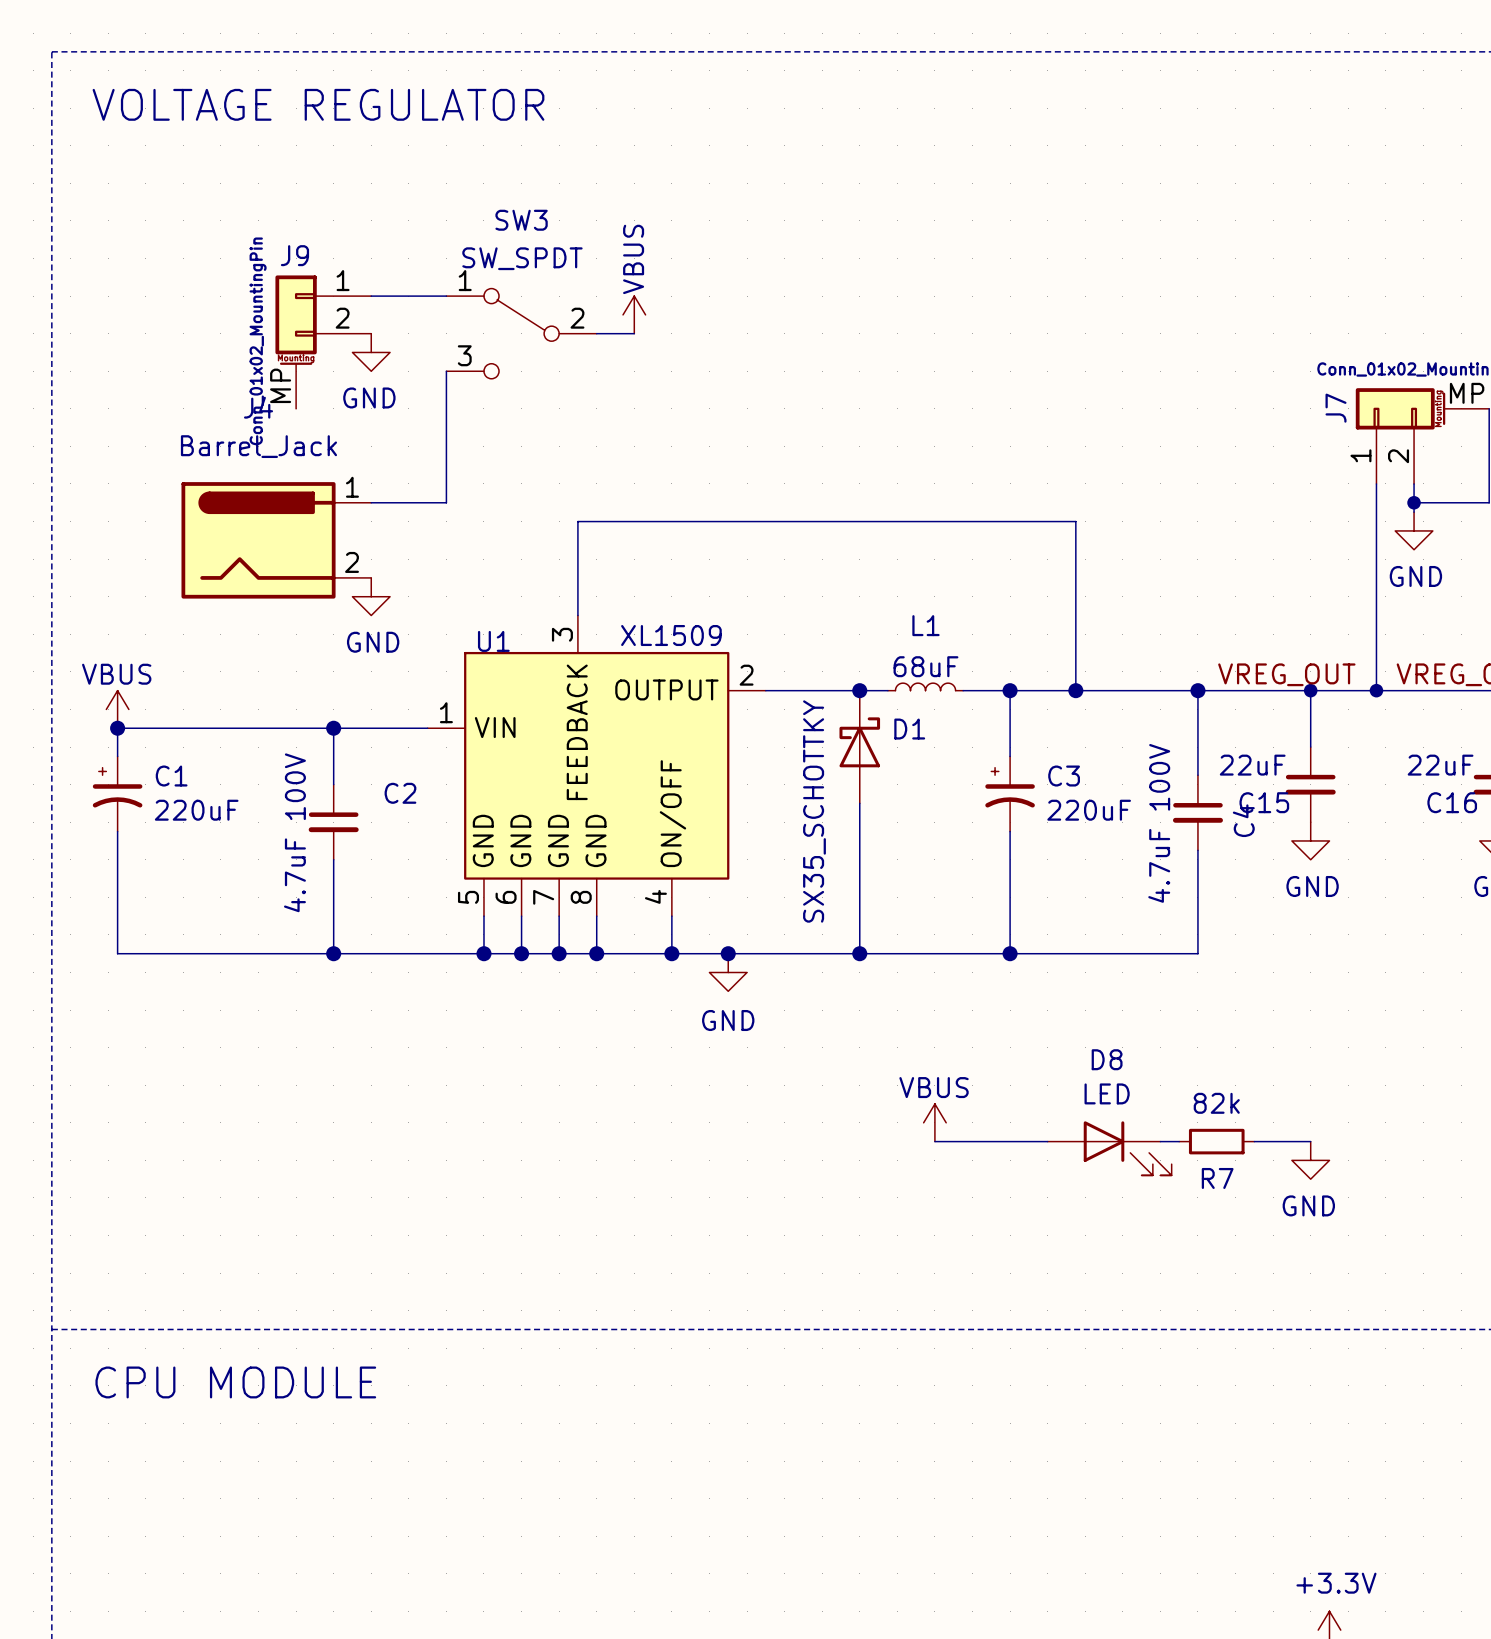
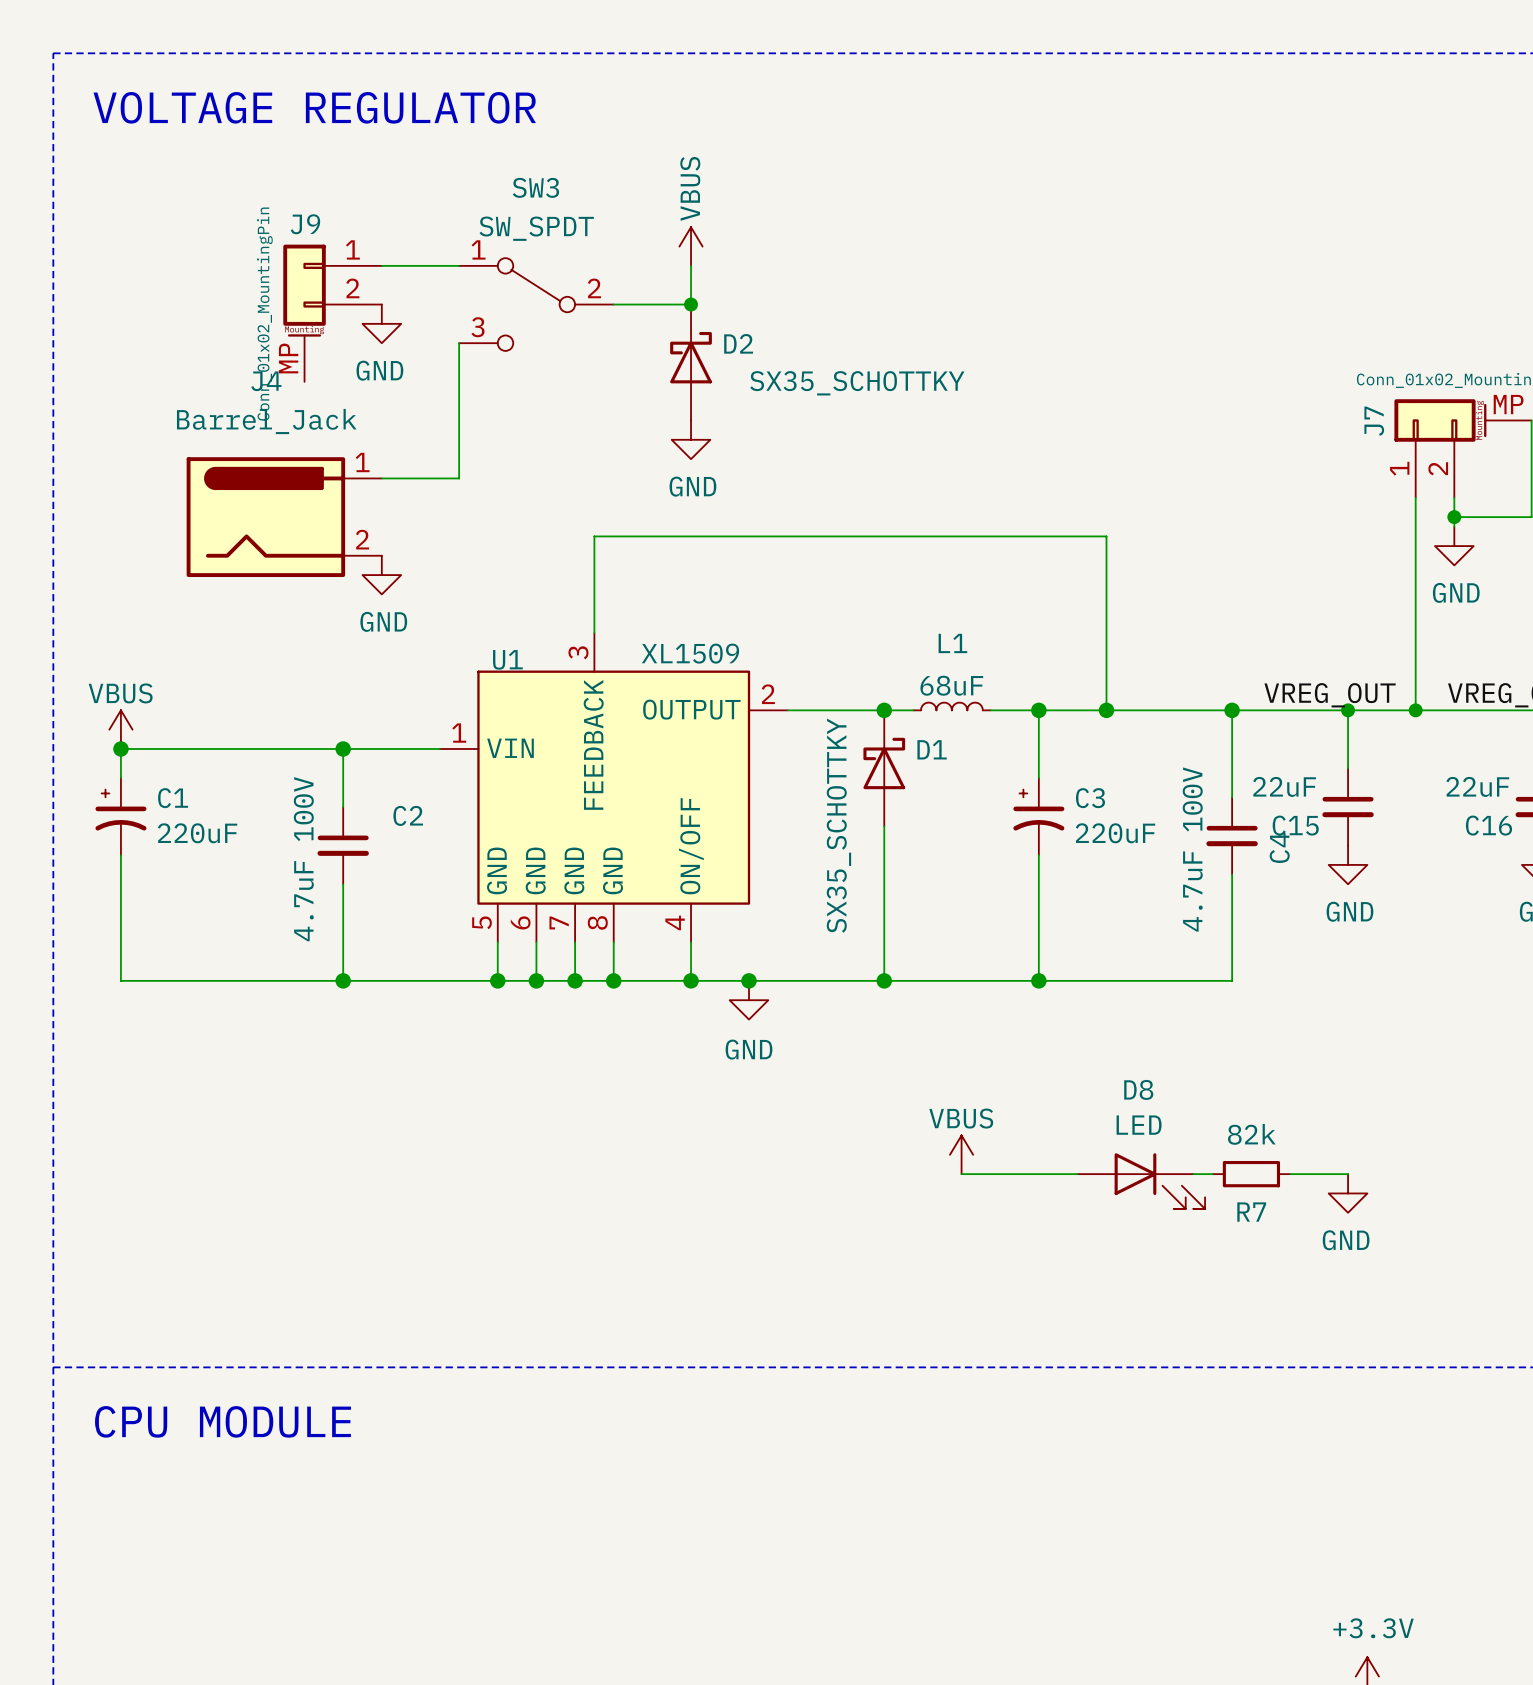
wire: none -> (691, 265) (691, 304) (613, 304)
wire: (371, 296) (446, 296) -> (381, 265) (459, 265)
junction: none -> (691, 304)
power symbol position: VBUS (634, 314) -> VBUS (691, 246)
wire: none -> (459, 343) (459, 381)
SW3 position: (521, 333) -> (536, 304)
wire: (596, 333) (634, 333) -> none
J9 position: (323, 342) -> (332, 313)
power symbol position: GND (371, 352) -> GND (381, 323)
D2: none -> SX35_SCHOTTKY (691, 362)
power symbol: none -> GND (691, 439)
wire: (446, 465) (446, 502) (371, 502) -> (459, 478) (381, 478)
J4 position: (276, 540) -> (284, 517)
power symbol position: GND (371, 596) -> GND (381, 575)

